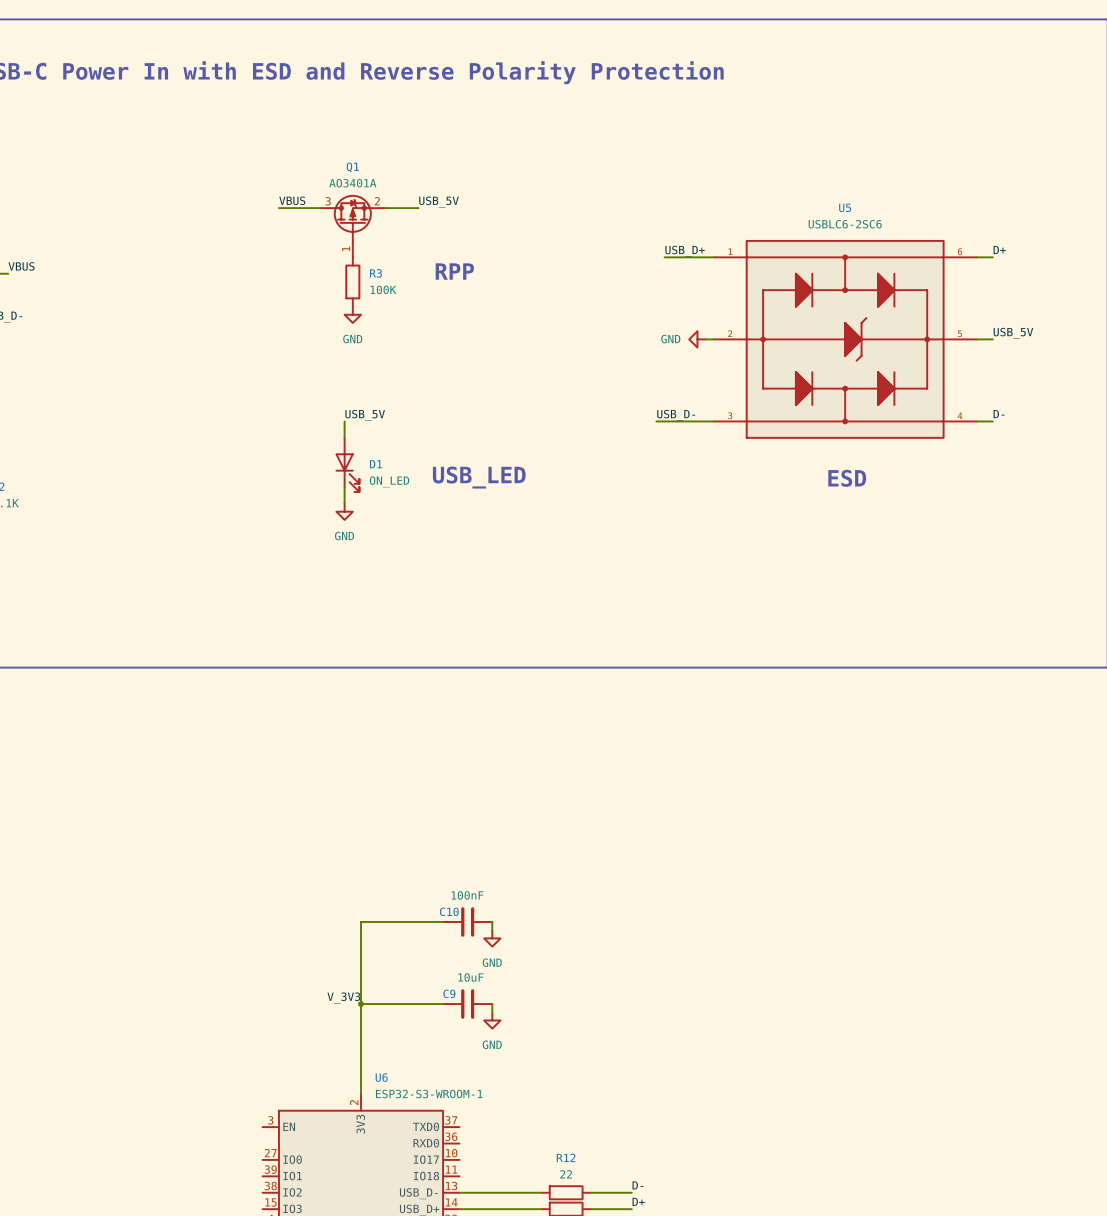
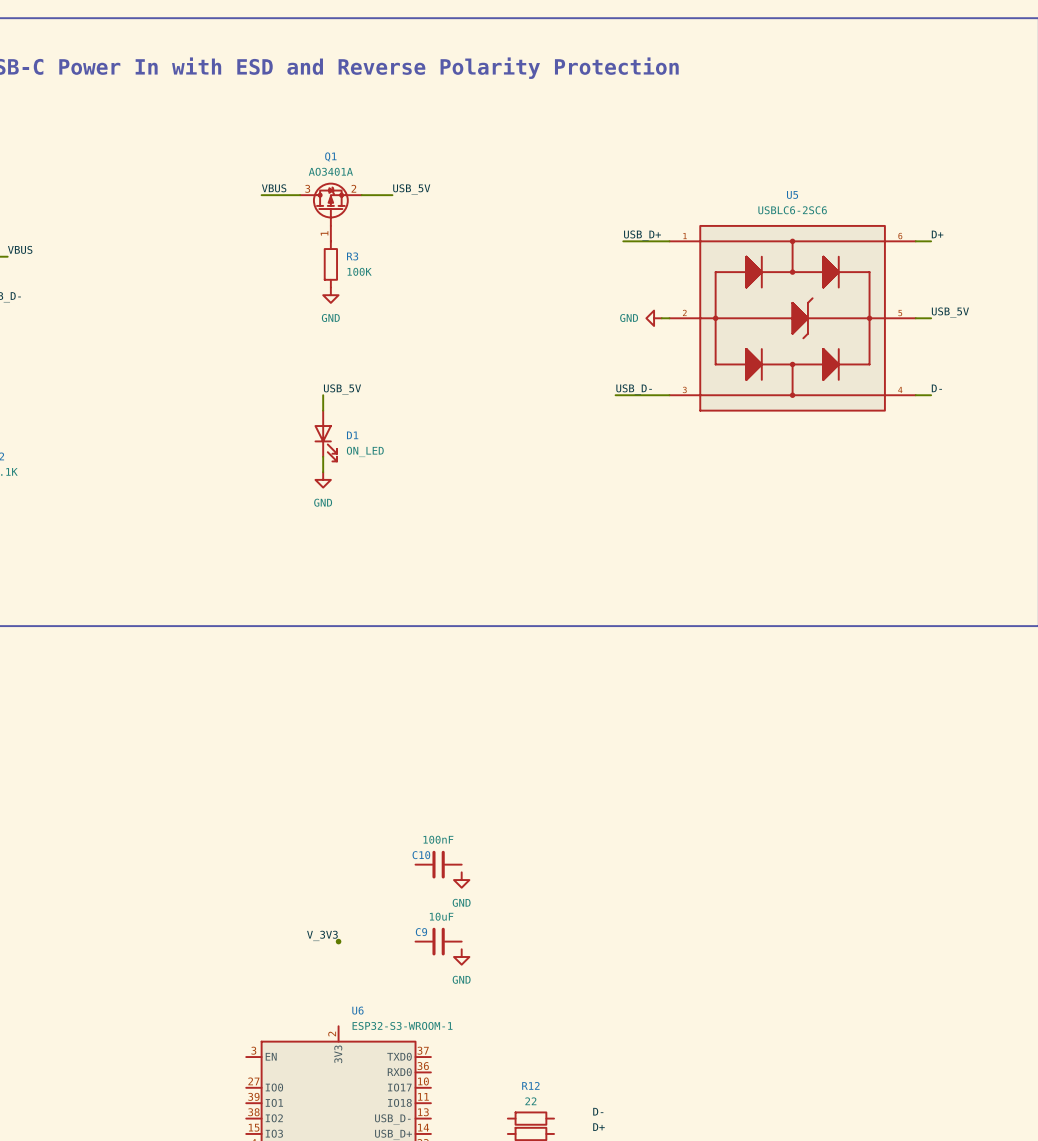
text: RPP (454, 271) -> none
text: USB_LED (479, 477) -> none
text: ESD (847, 478) -> none
wire: (443, 921) (361, 921) (361, 1094) -> none
wire: (492, 921) (492, 930) -> none
wire: (361, 1004) (443, 1004) -> none
wire: (492, 1004) (492, 1012) -> none
wire: (459, 1192) (541, 1192) -> none
wire: (590, 1192) (631, 1192) -> none
wire: (459, 1209) (541, 1209) -> none
wire: (590, 1209) (631, 1209) -> none

